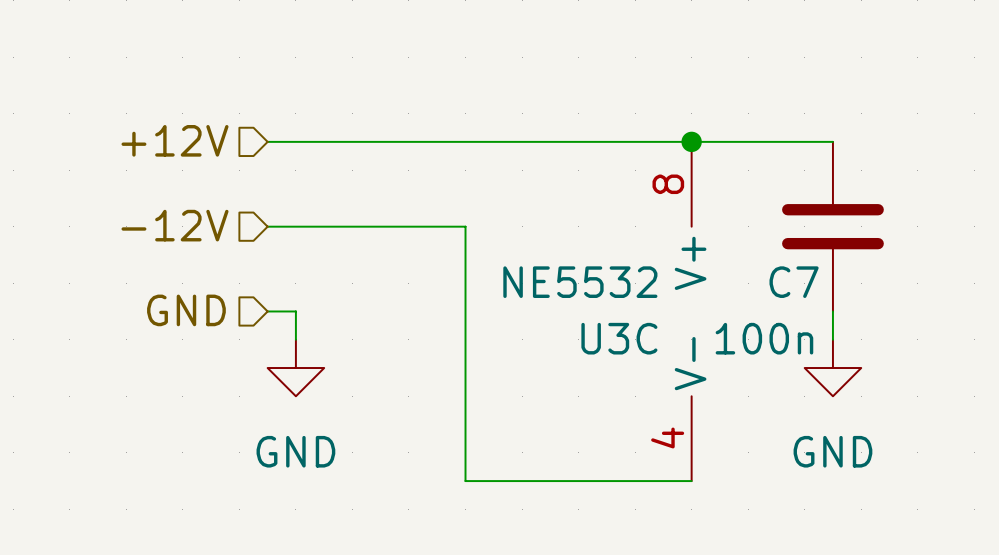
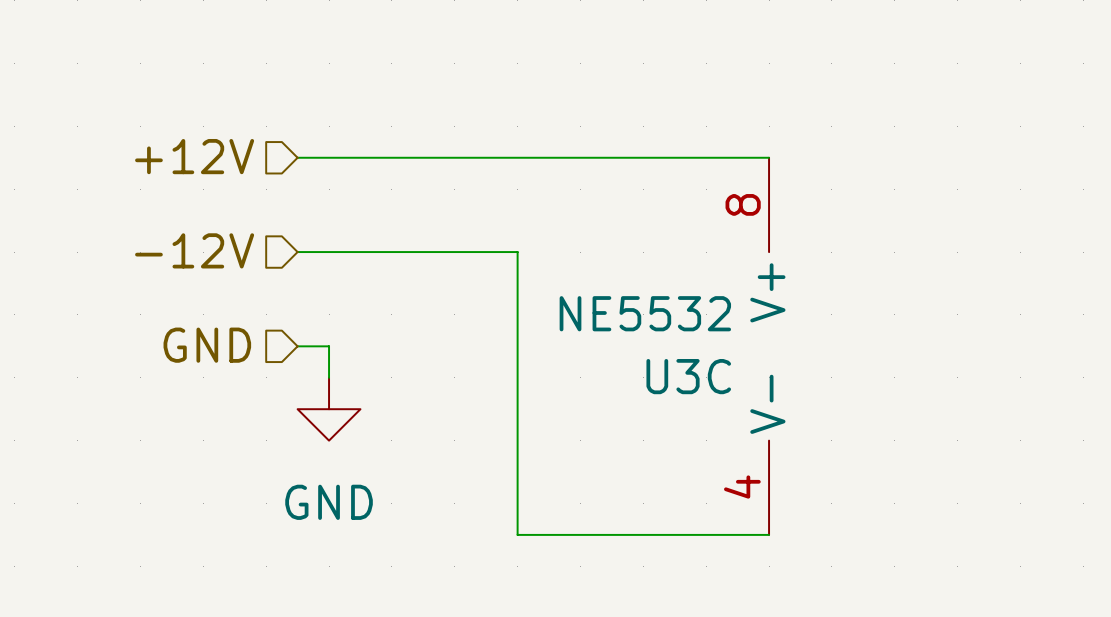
wire: (691, 141) (832, 141) -> none
junction: (691, 141) -> none
C7: 100n (832, 226) -> none
wire: (832, 311) (832, 339) -> none
power symbol: GND (832, 368) -> none

